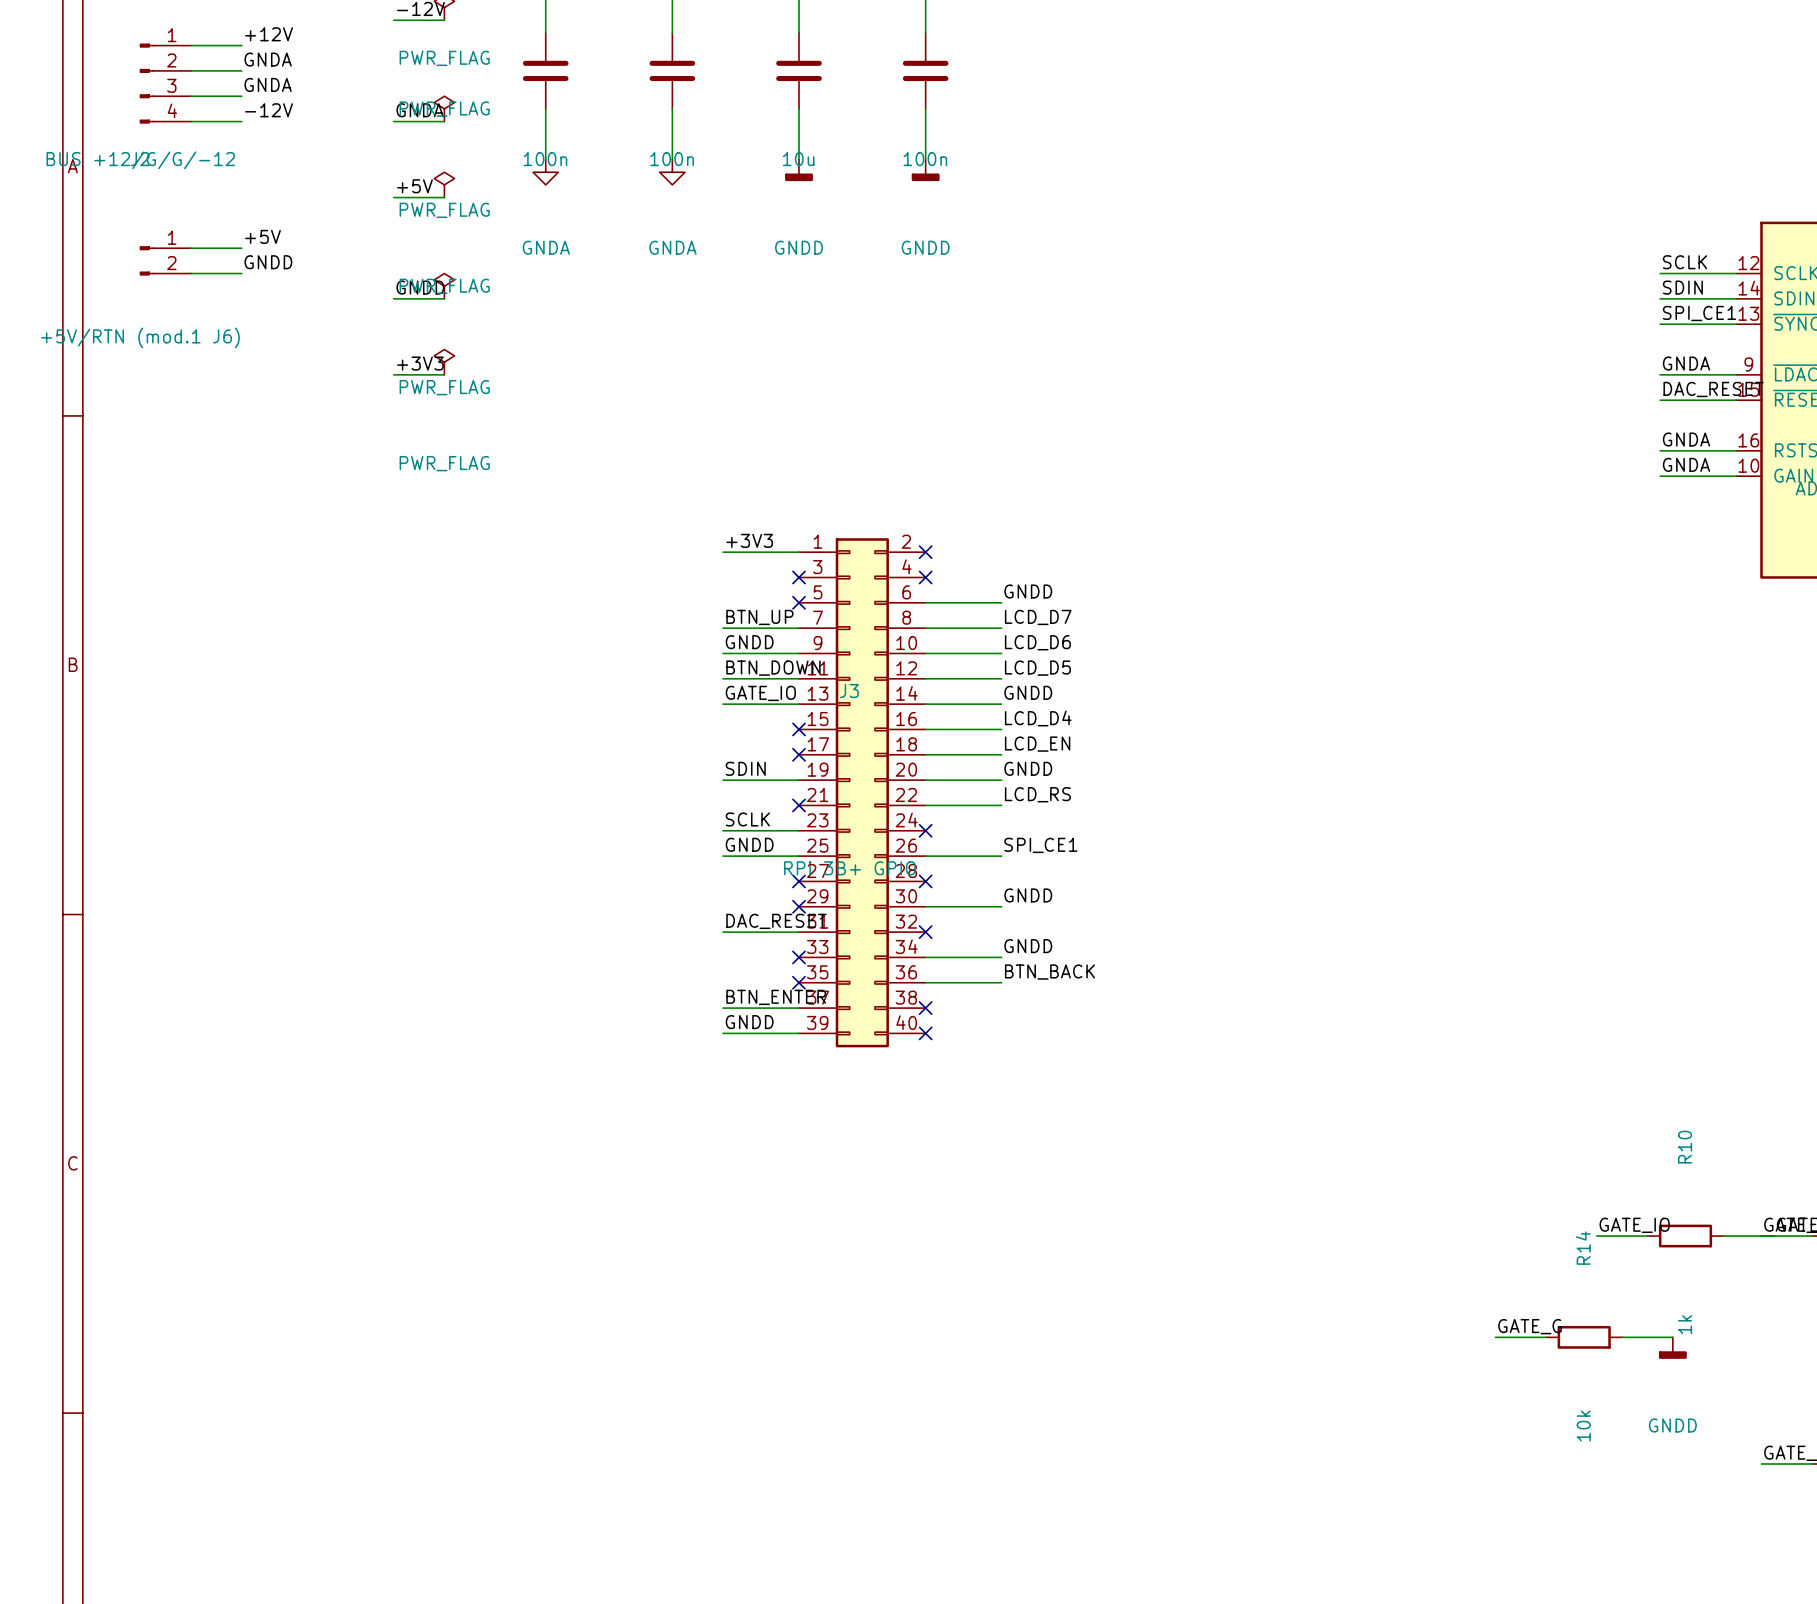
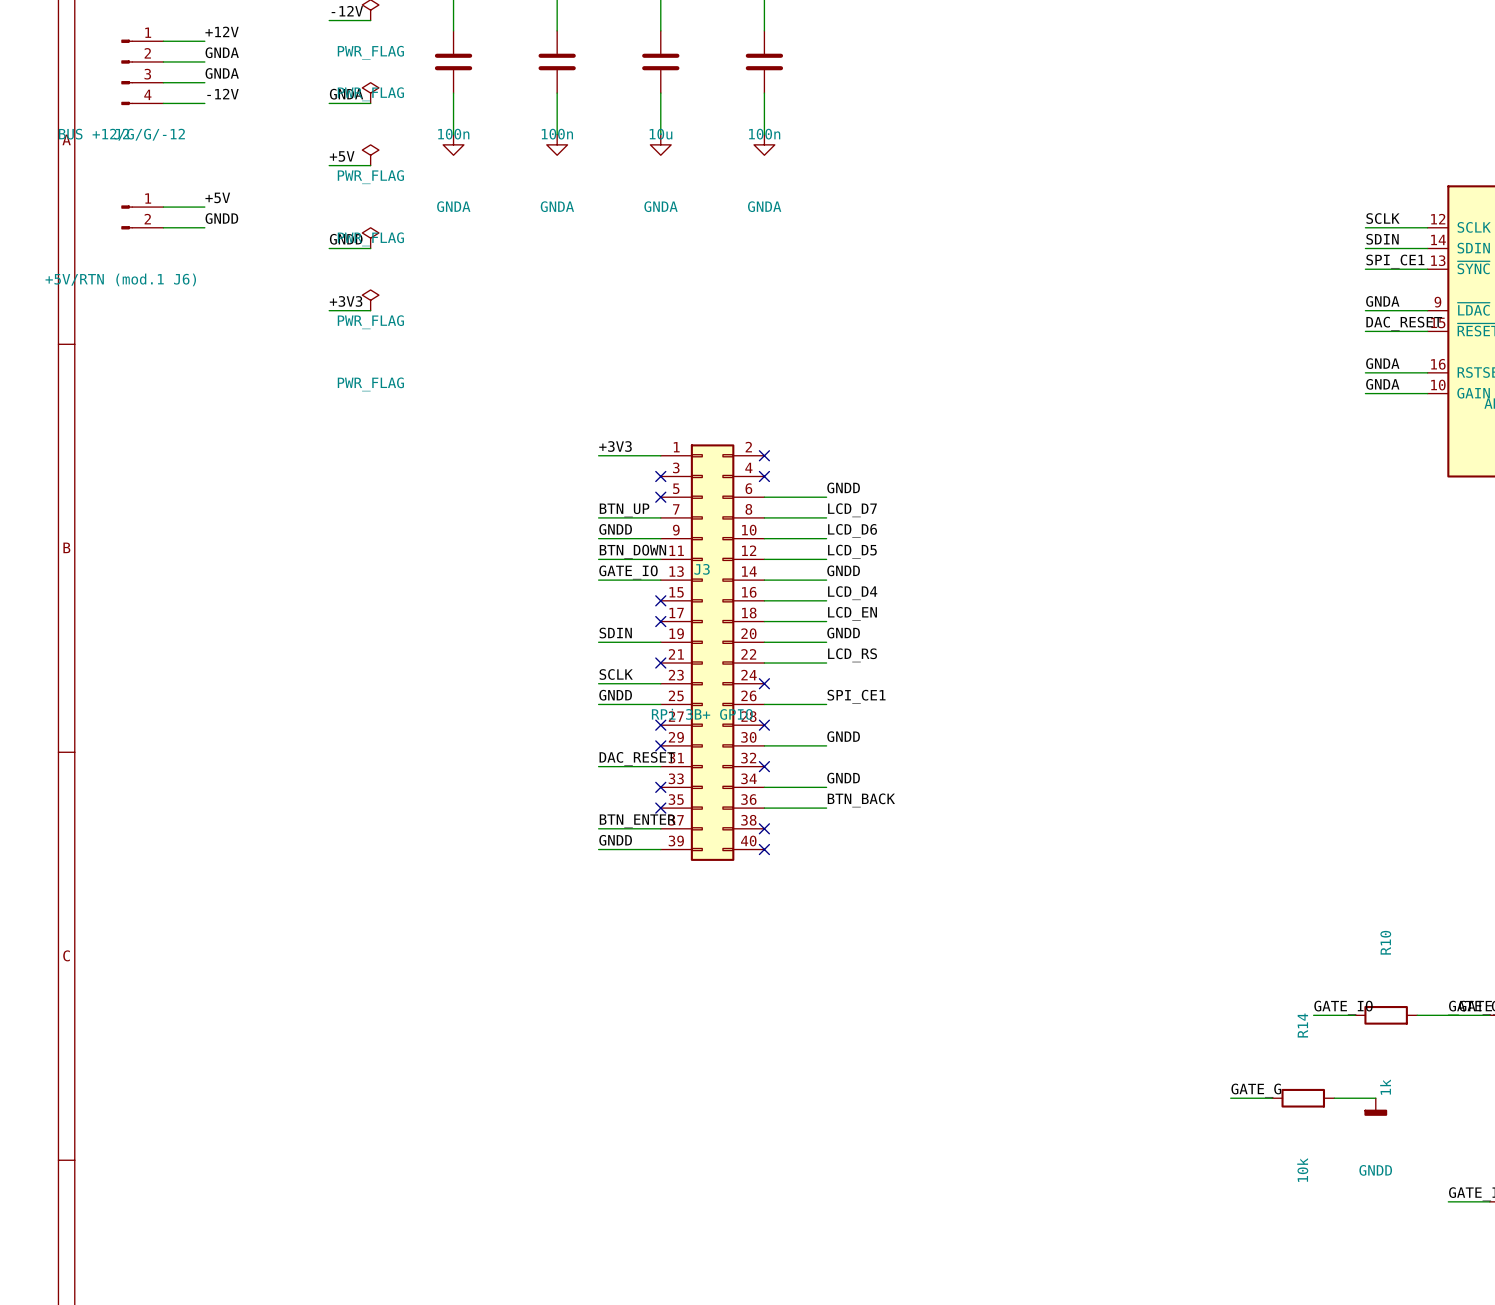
power symbol: GNDD (799, 170) -> GNDA (660, 144)
power symbol: GNDD (925, 170) -> GNDA (764, 144)

